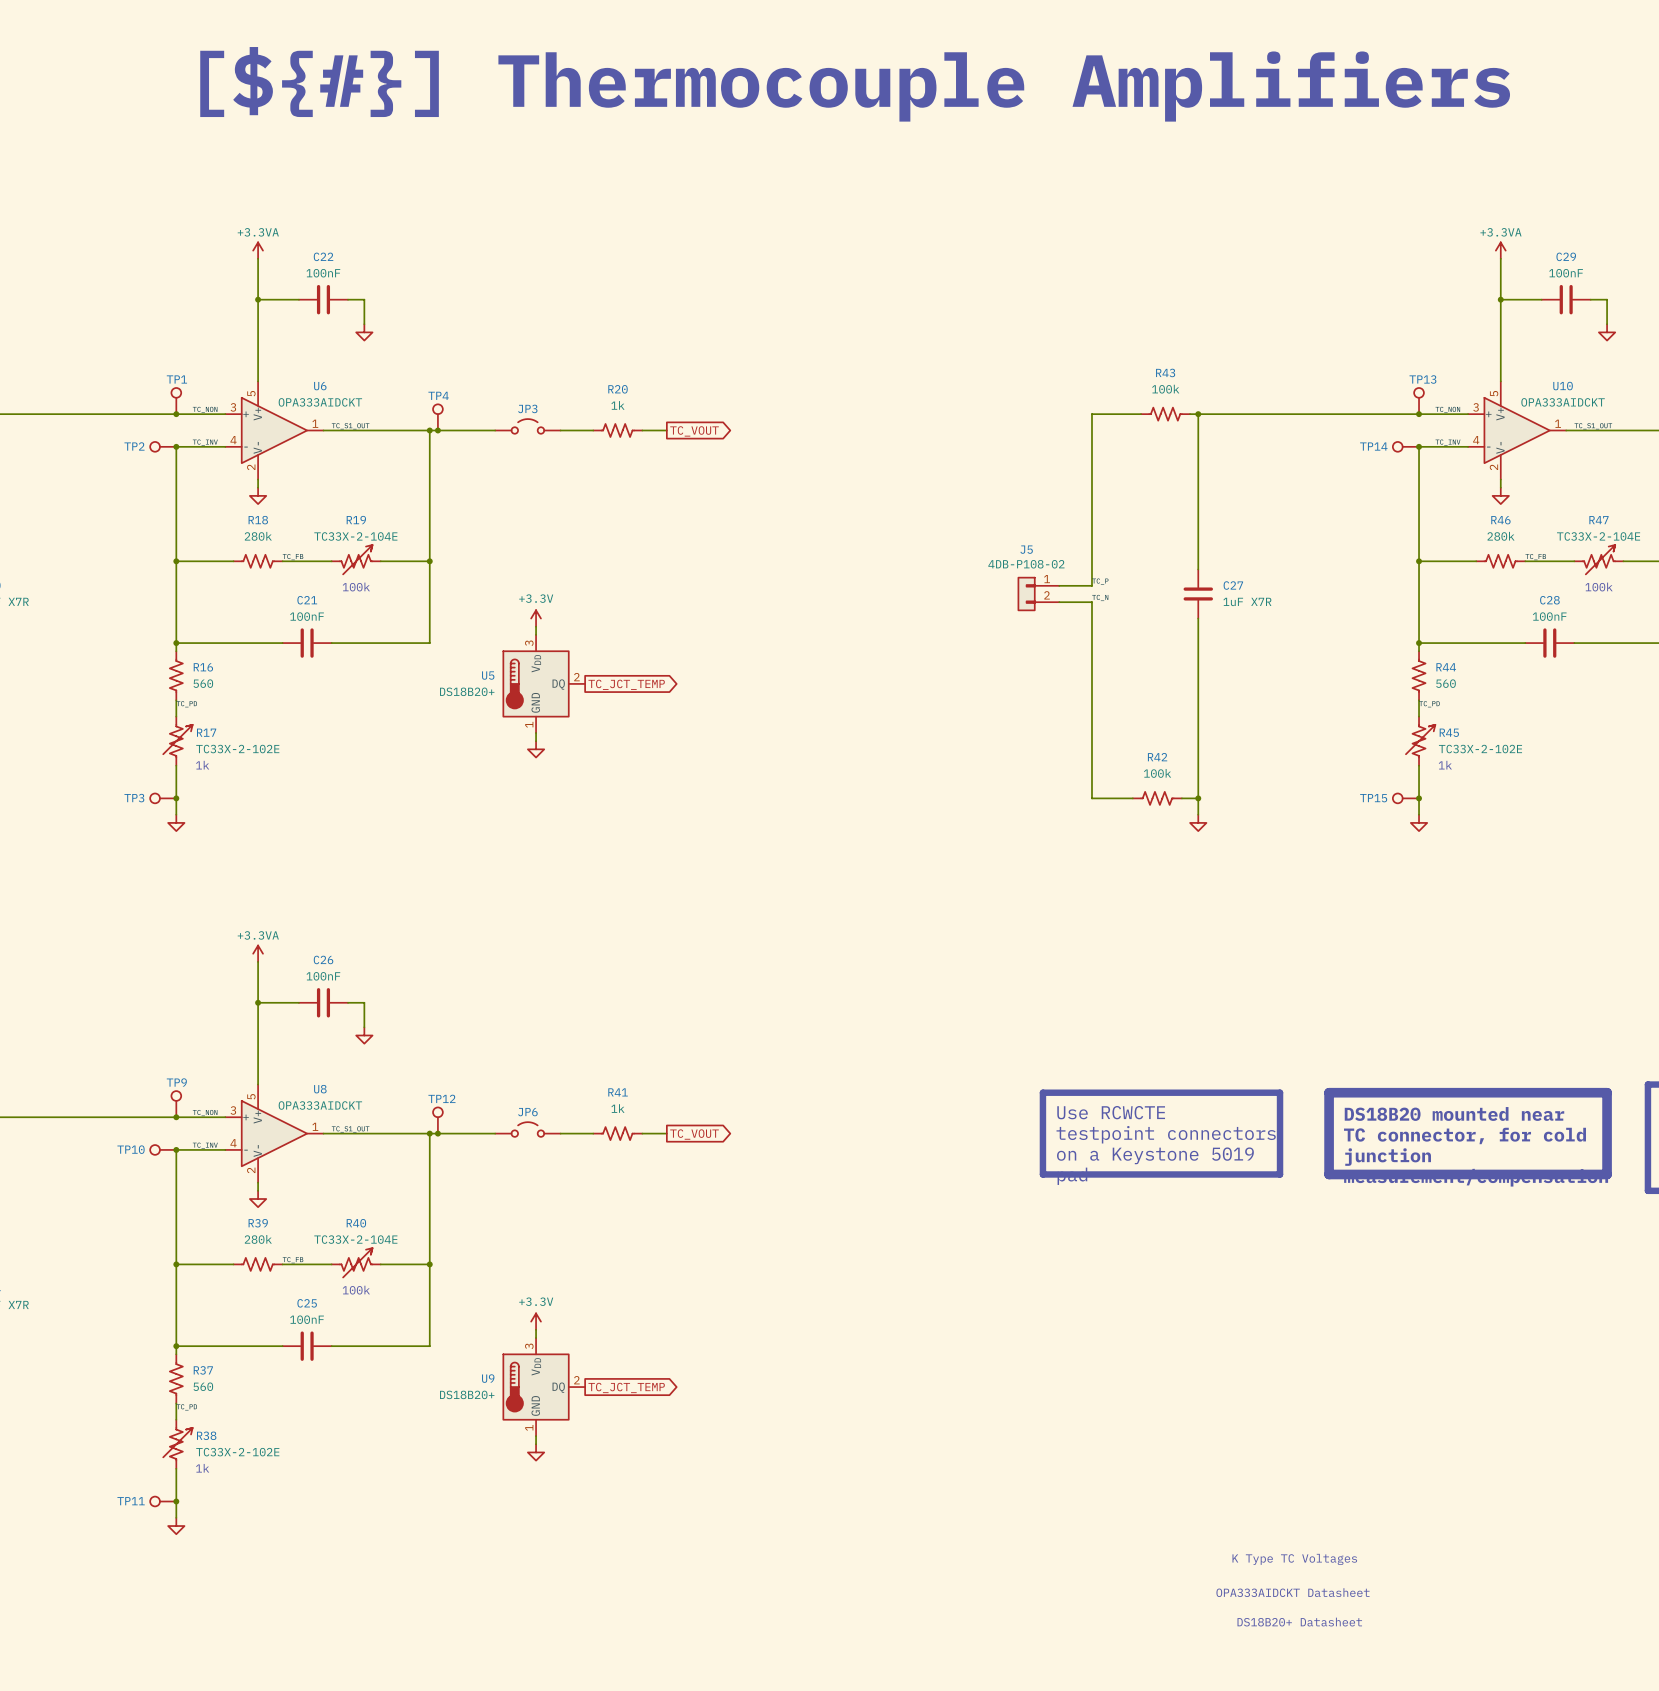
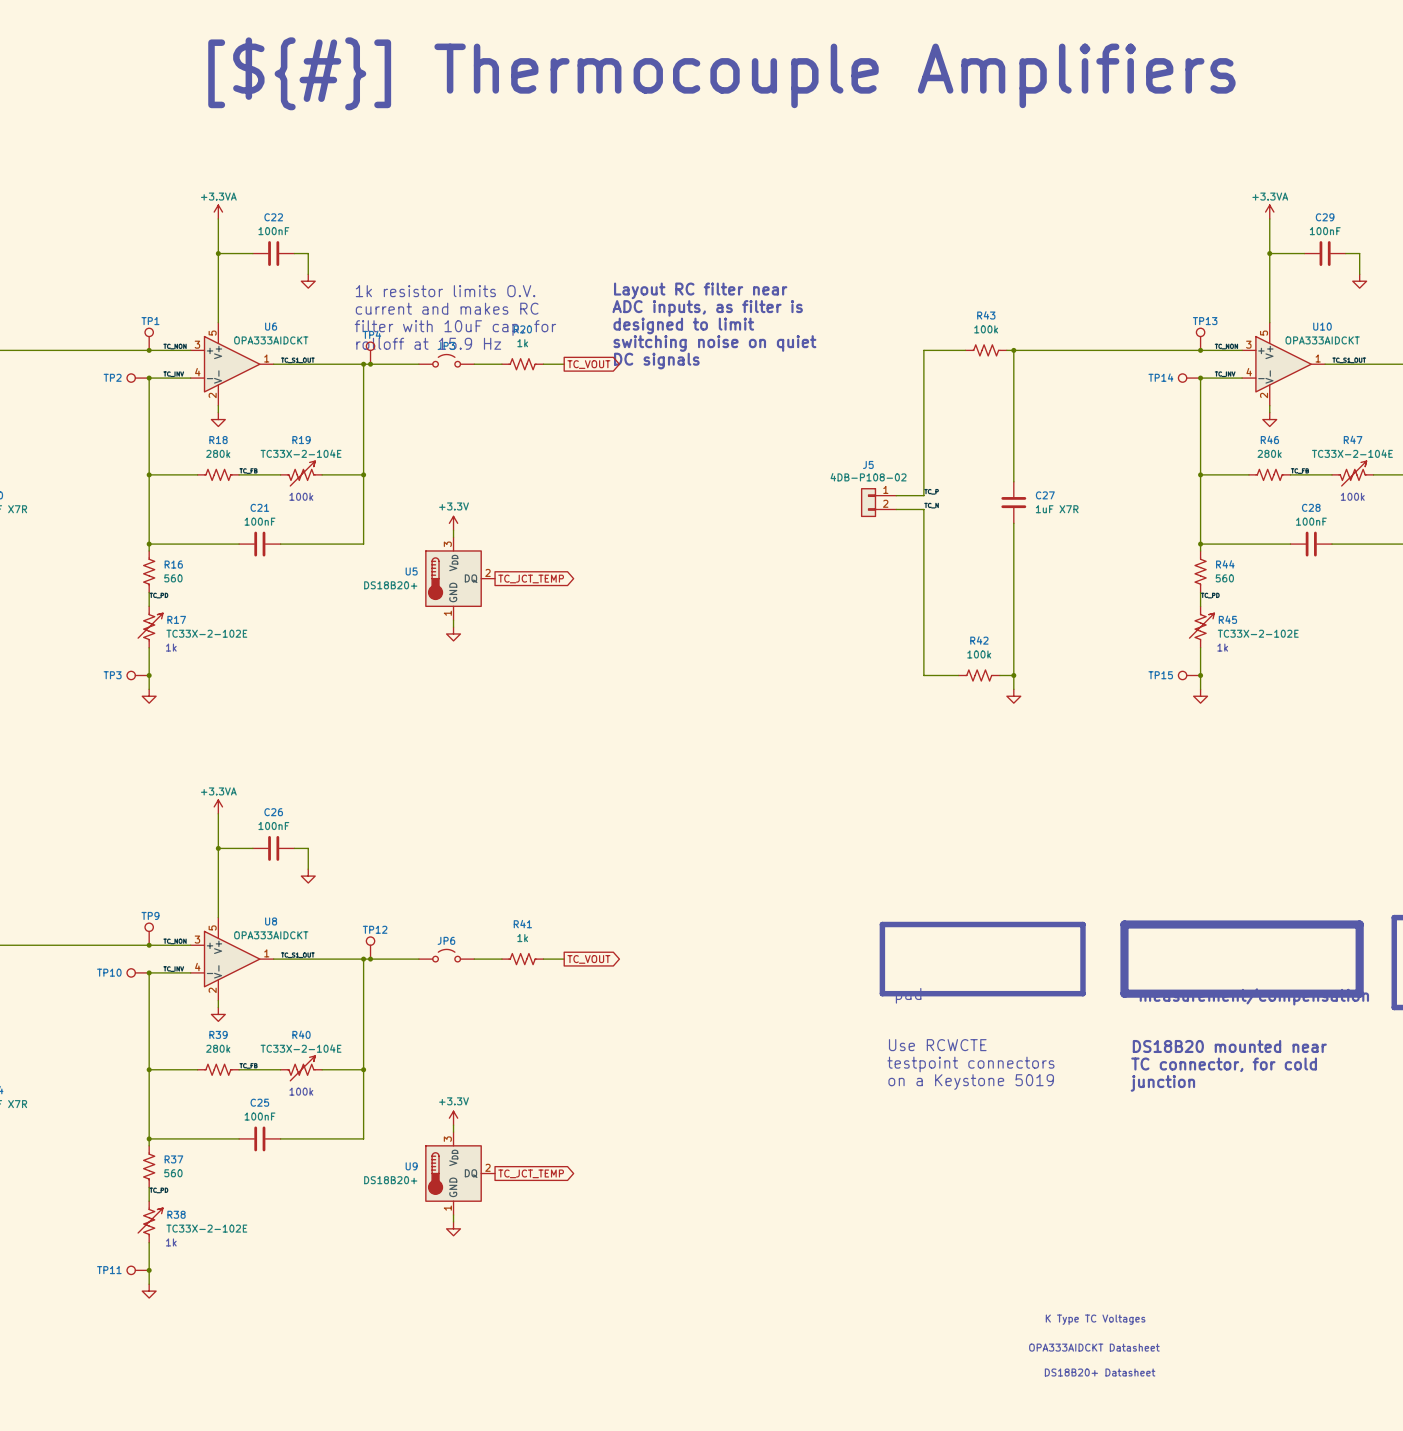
text: none -> 1k resistor limits O.V. (445, 291)
text: none -> Layout RC filter near (700, 290)
text: none -> ADC inputs, as filter is (707, 308)
text: none -> current and makes RC (447, 308)
text: none -> designed to limit (683, 325)
text: none -> filter with 10uF cap, for (455, 328)
text: none -> switching noise on quiet (714, 343)
text: none -> rolloff at 15.9 Hz (428, 343)
text: none -> DC signals (656, 361)
text position: Use RCWCTE (1111, 1112) -> Use RCWCTE (937, 1045)
text position: DS18B20 mounted near (1454, 1113) -> DS18B20 mounted near (1229, 1046)
text position: testpoint connectors (1166, 1134) -> testpoint connectors (970, 1064)
text position: TC connector, for cold (1464, 1135) -> TC connector, for cold (1224, 1064)
text position: on a Keystone 5019 (1155, 1155) -> on a Keystone 5019 (971, 1082)
text position: junction (1388, 1157) -> junction (1162, 1083)

